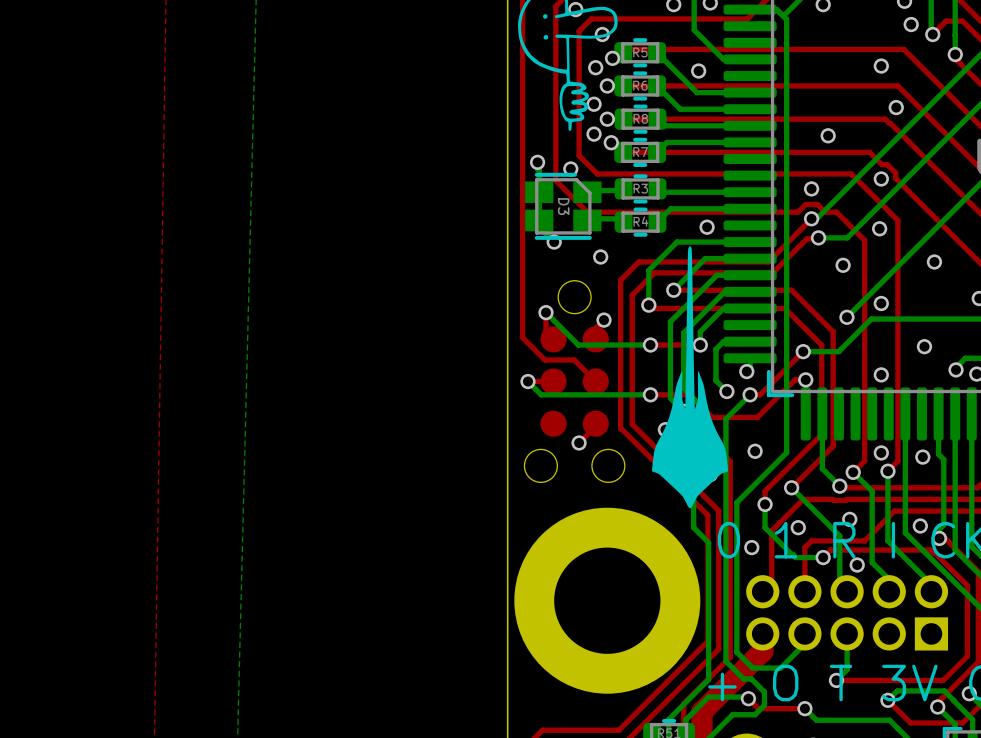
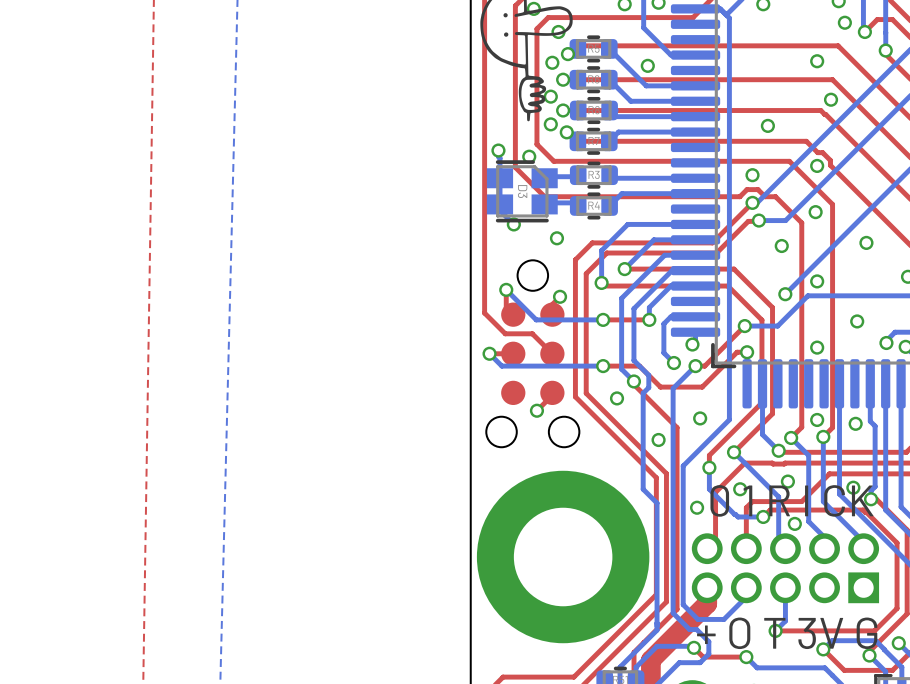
via: (707, 227) -> none
drawing: [651, 246, 729, 509] -> none

